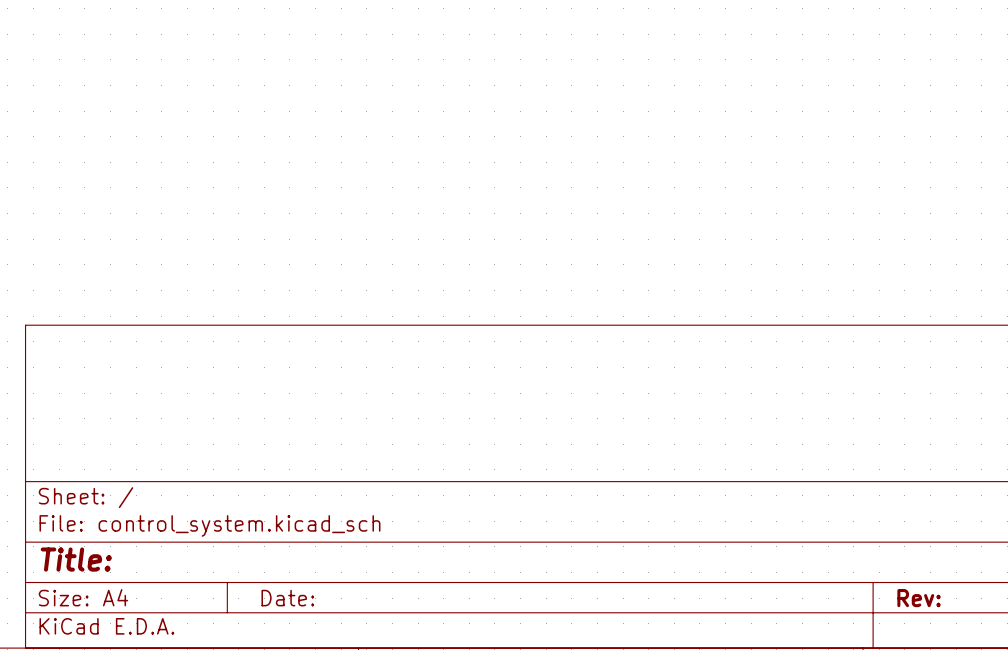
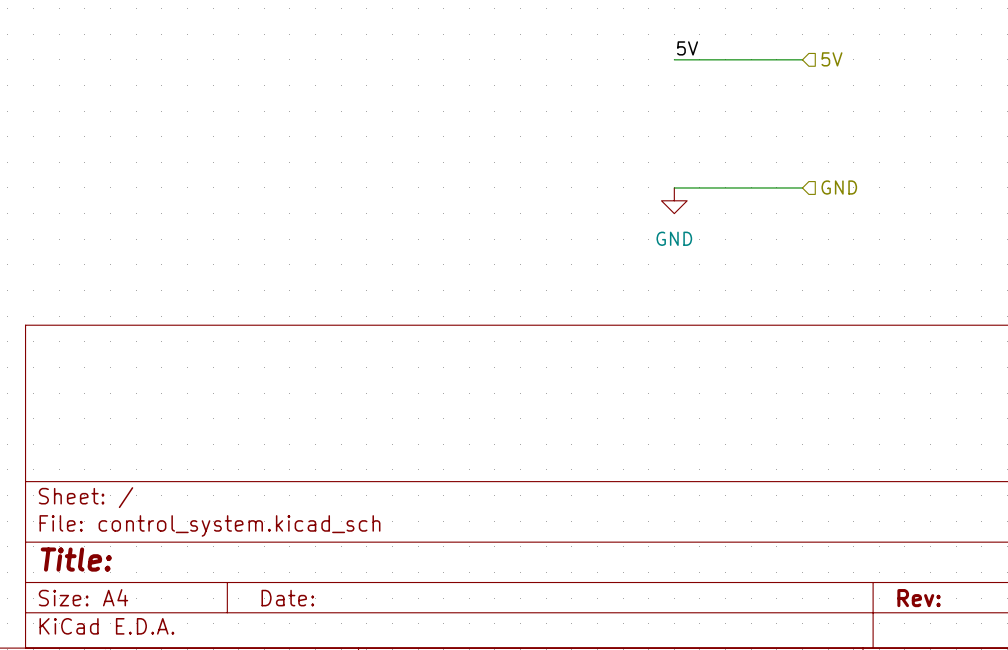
label: none -> 5V (687, 48)
wire: none -> (674, 59) (802, 59)
hierarchical label: none -> 5V (831, 59)
wire: none -> (674, 187) (802, 187)
hierarchical label: none -> GND (839, 187)
power symbol: none -> GND (674, 200)

